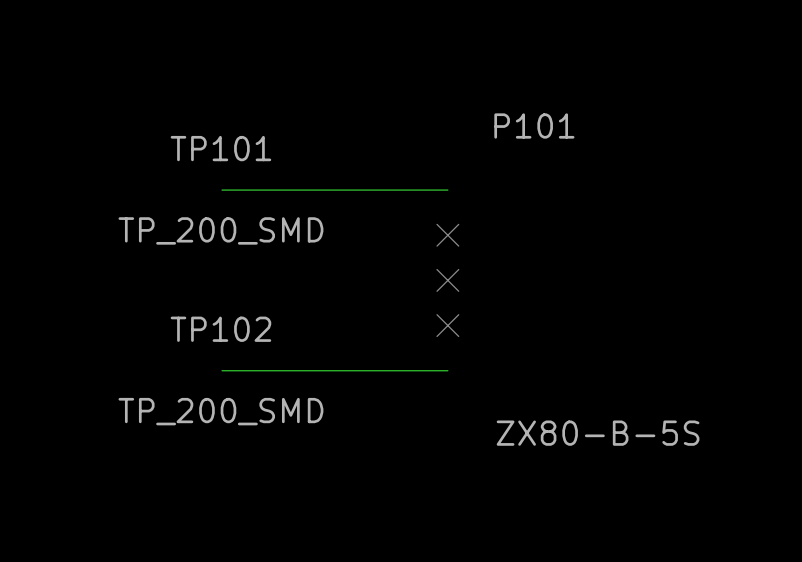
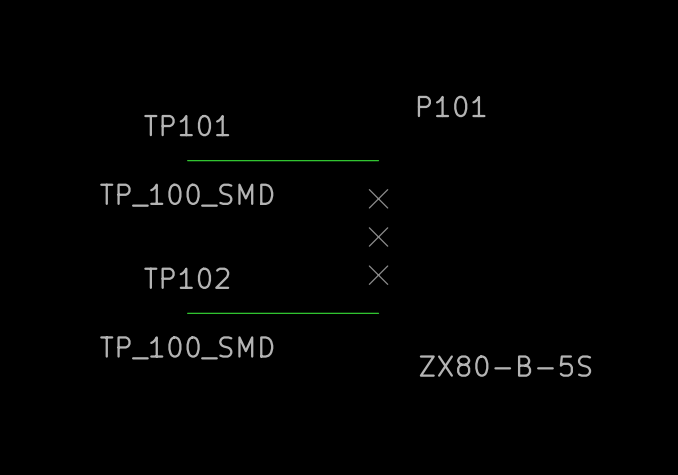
TP101 value: TP_200_SMD (220, 230) -> TP_100_SMD (186, 195)
TP102 value: TP_200_SMD (220, 411) -> TP_100_SMD (186, 347)

